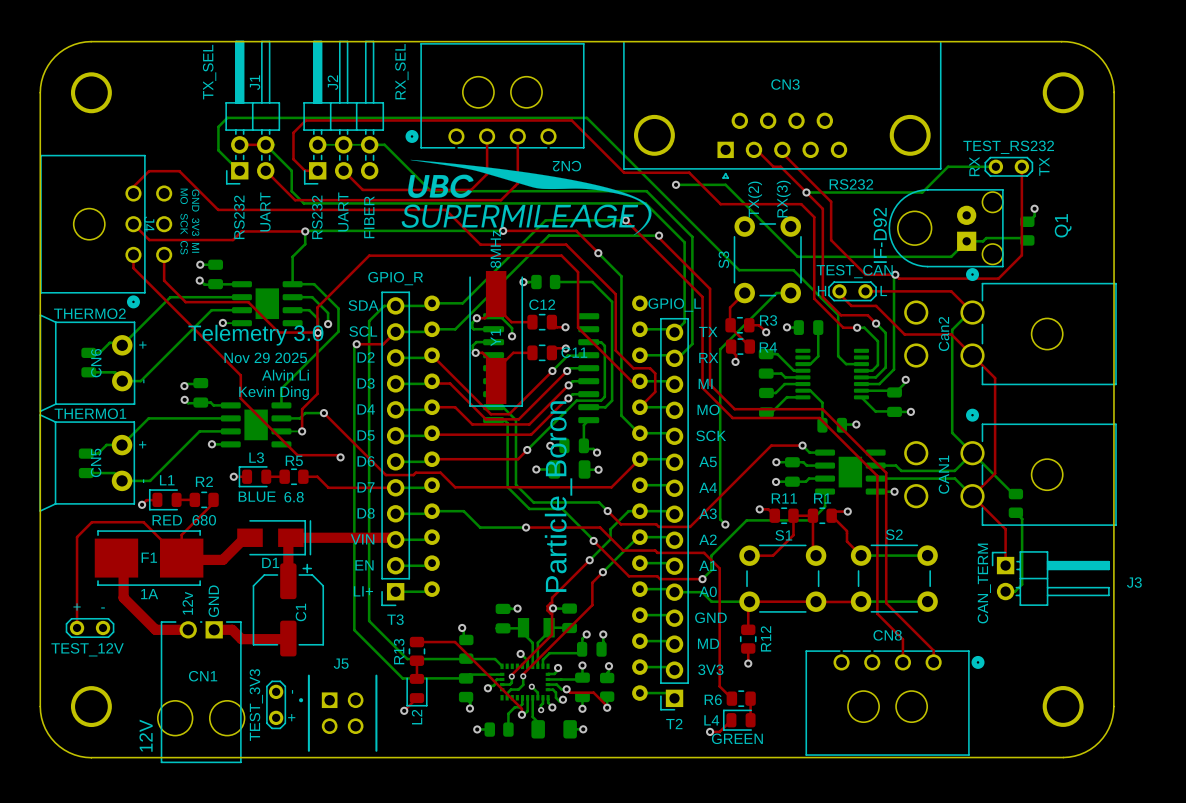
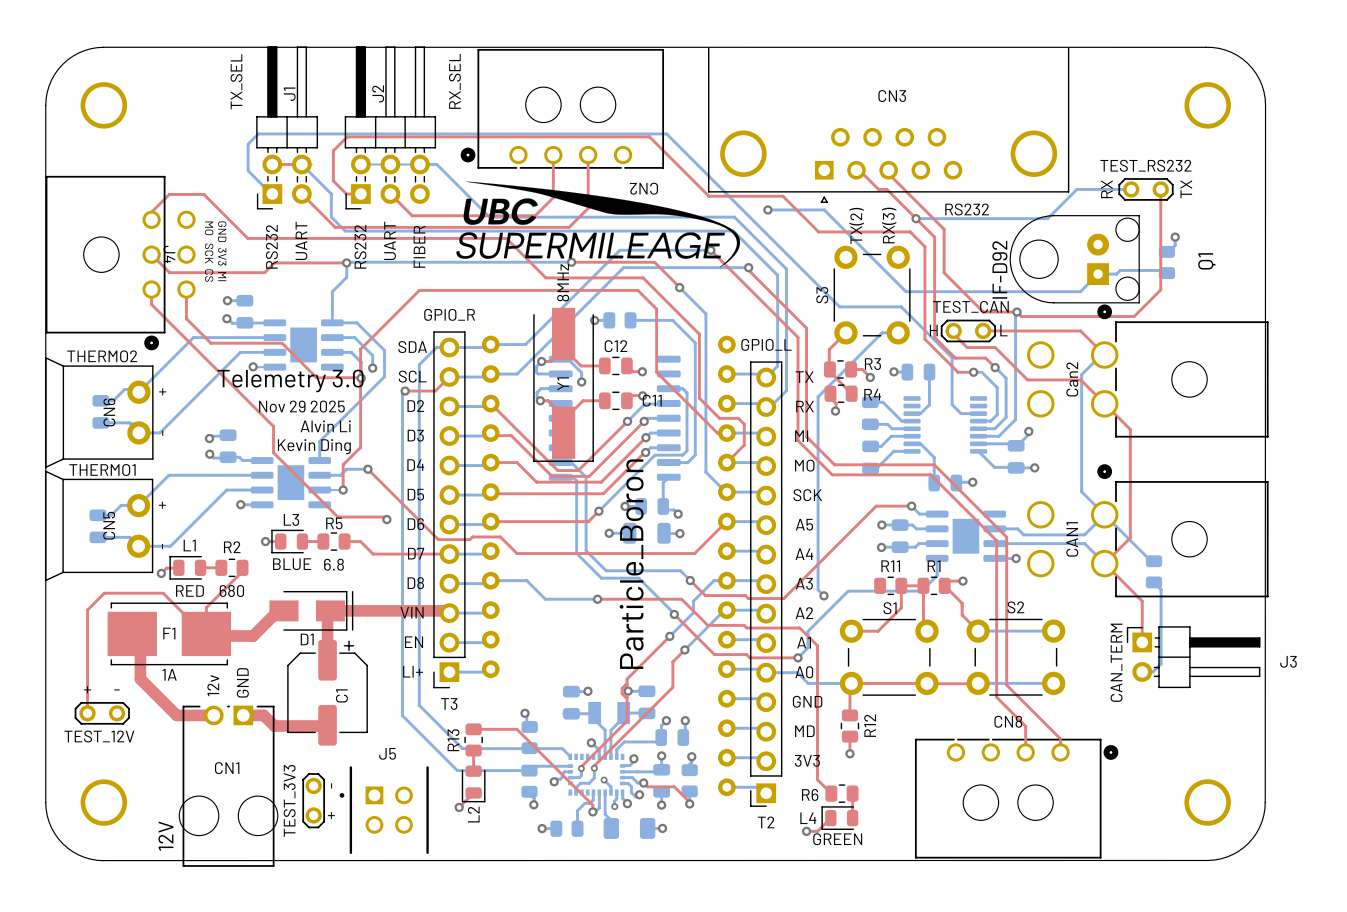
top track: (759, 509) (768, 509) (774, 515) -> none
via: (759, 509) -> none

